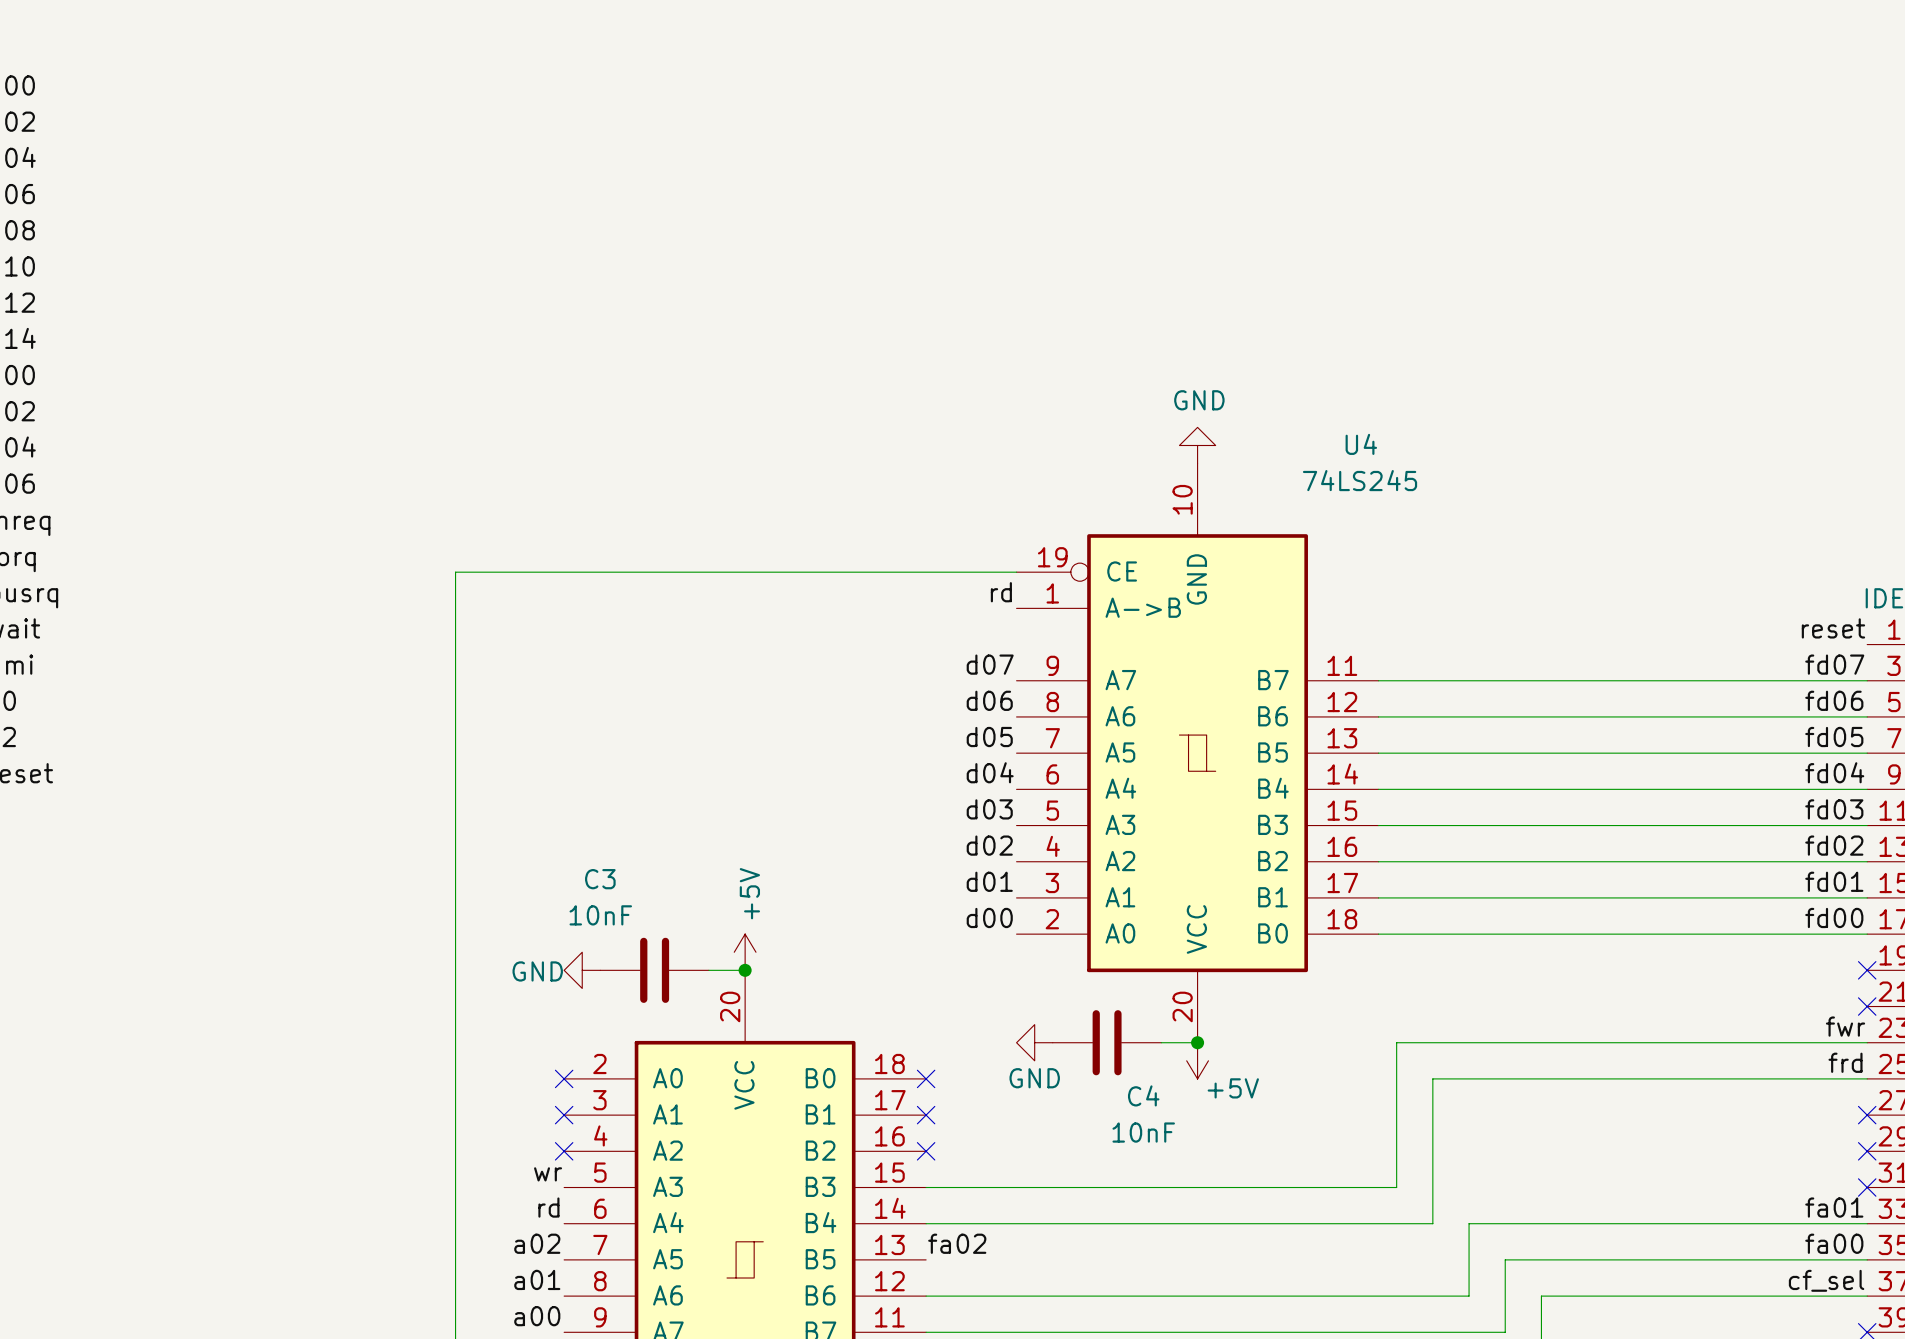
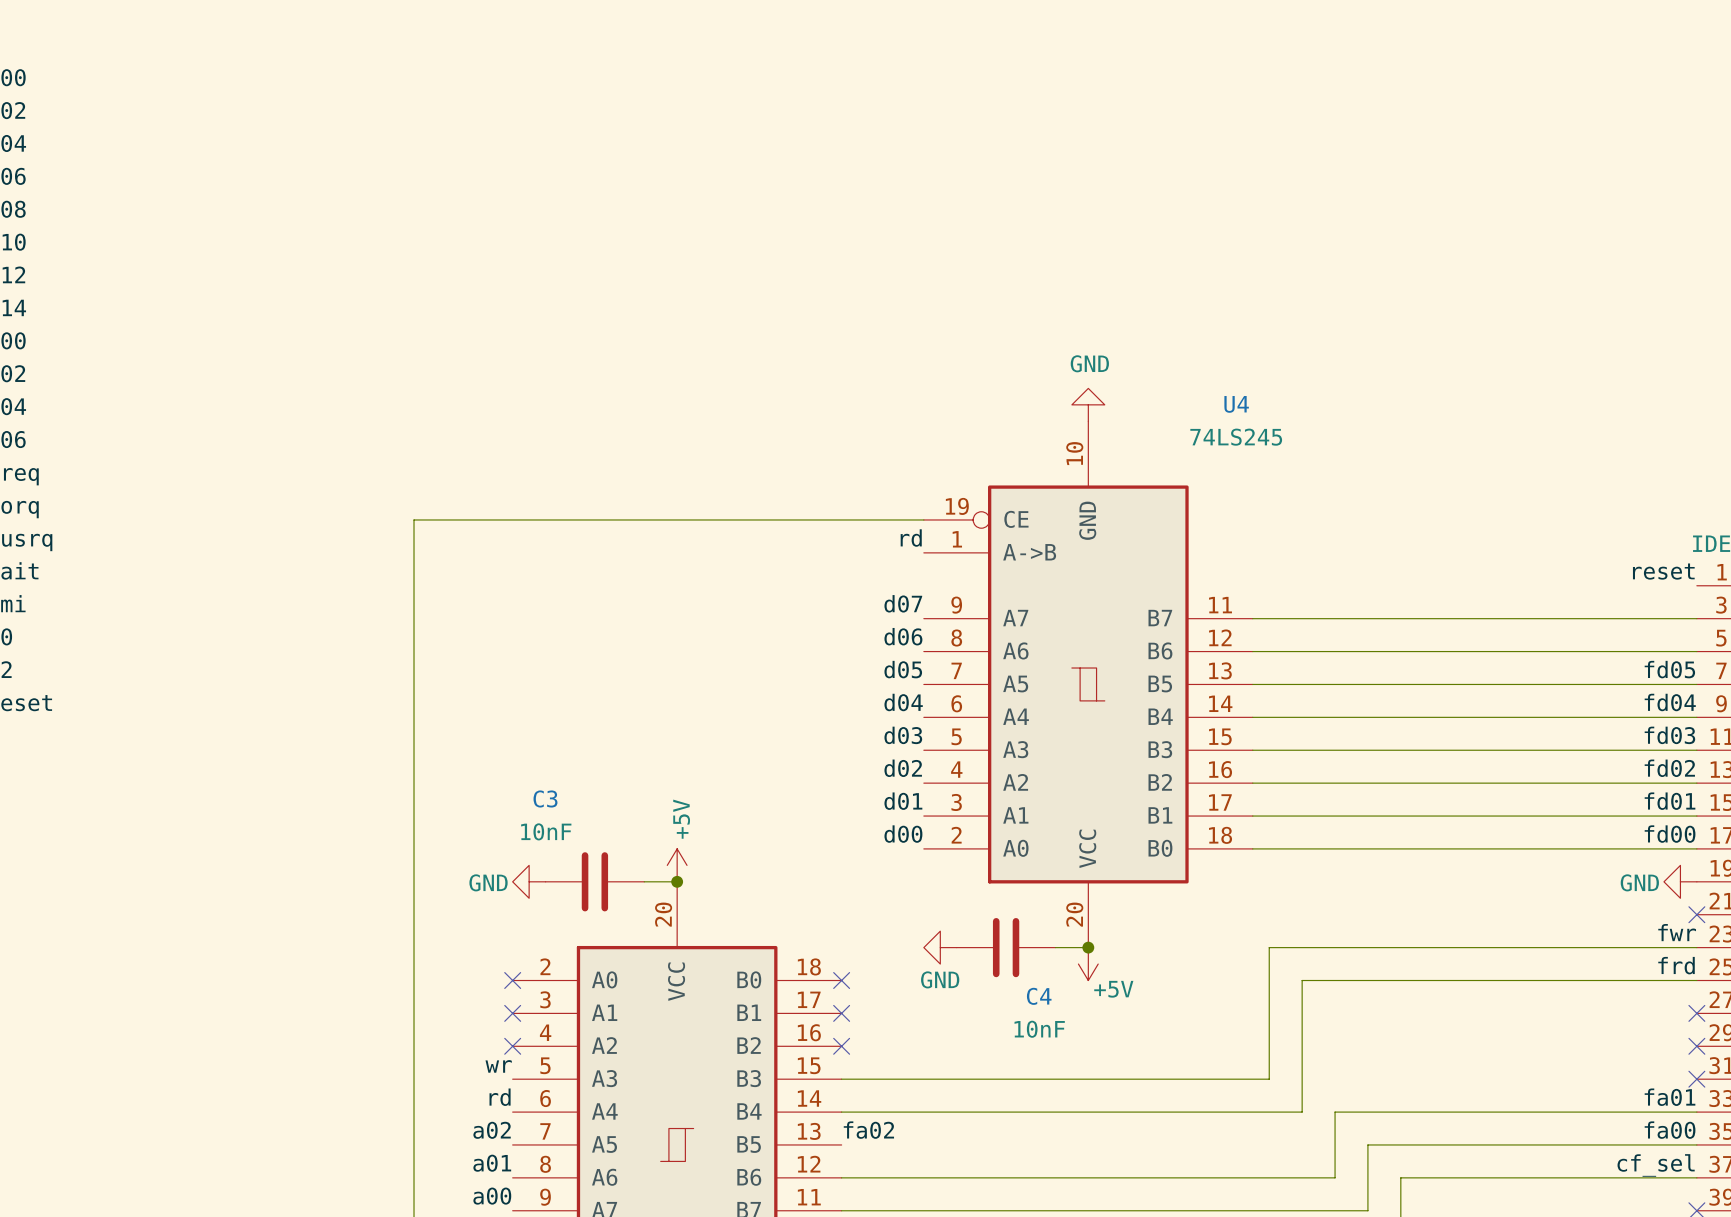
label: fd07 (1834, 664) -> none
label: fd06 (1834, 700) -> none
power symbol: none -> GND (1680, 881)
no-connect mark: (1867, 970) -> none

